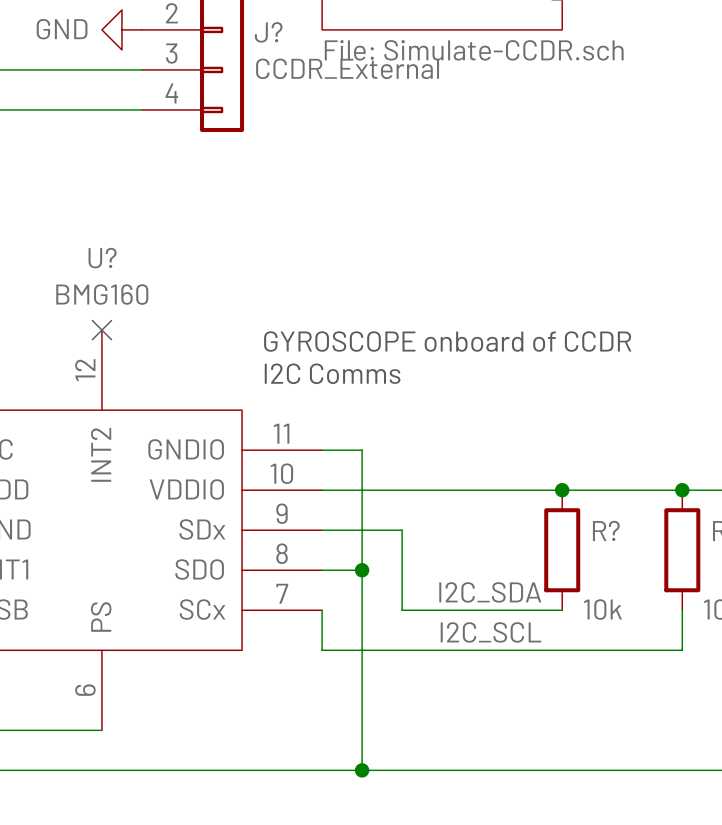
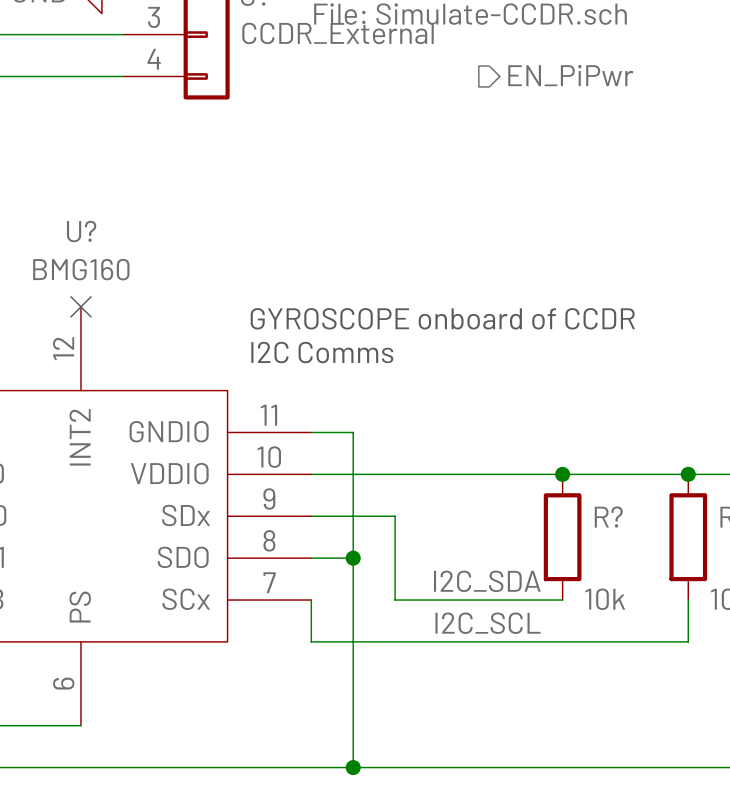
sheet pin: none -> EN_PiPwr (570, 75)

